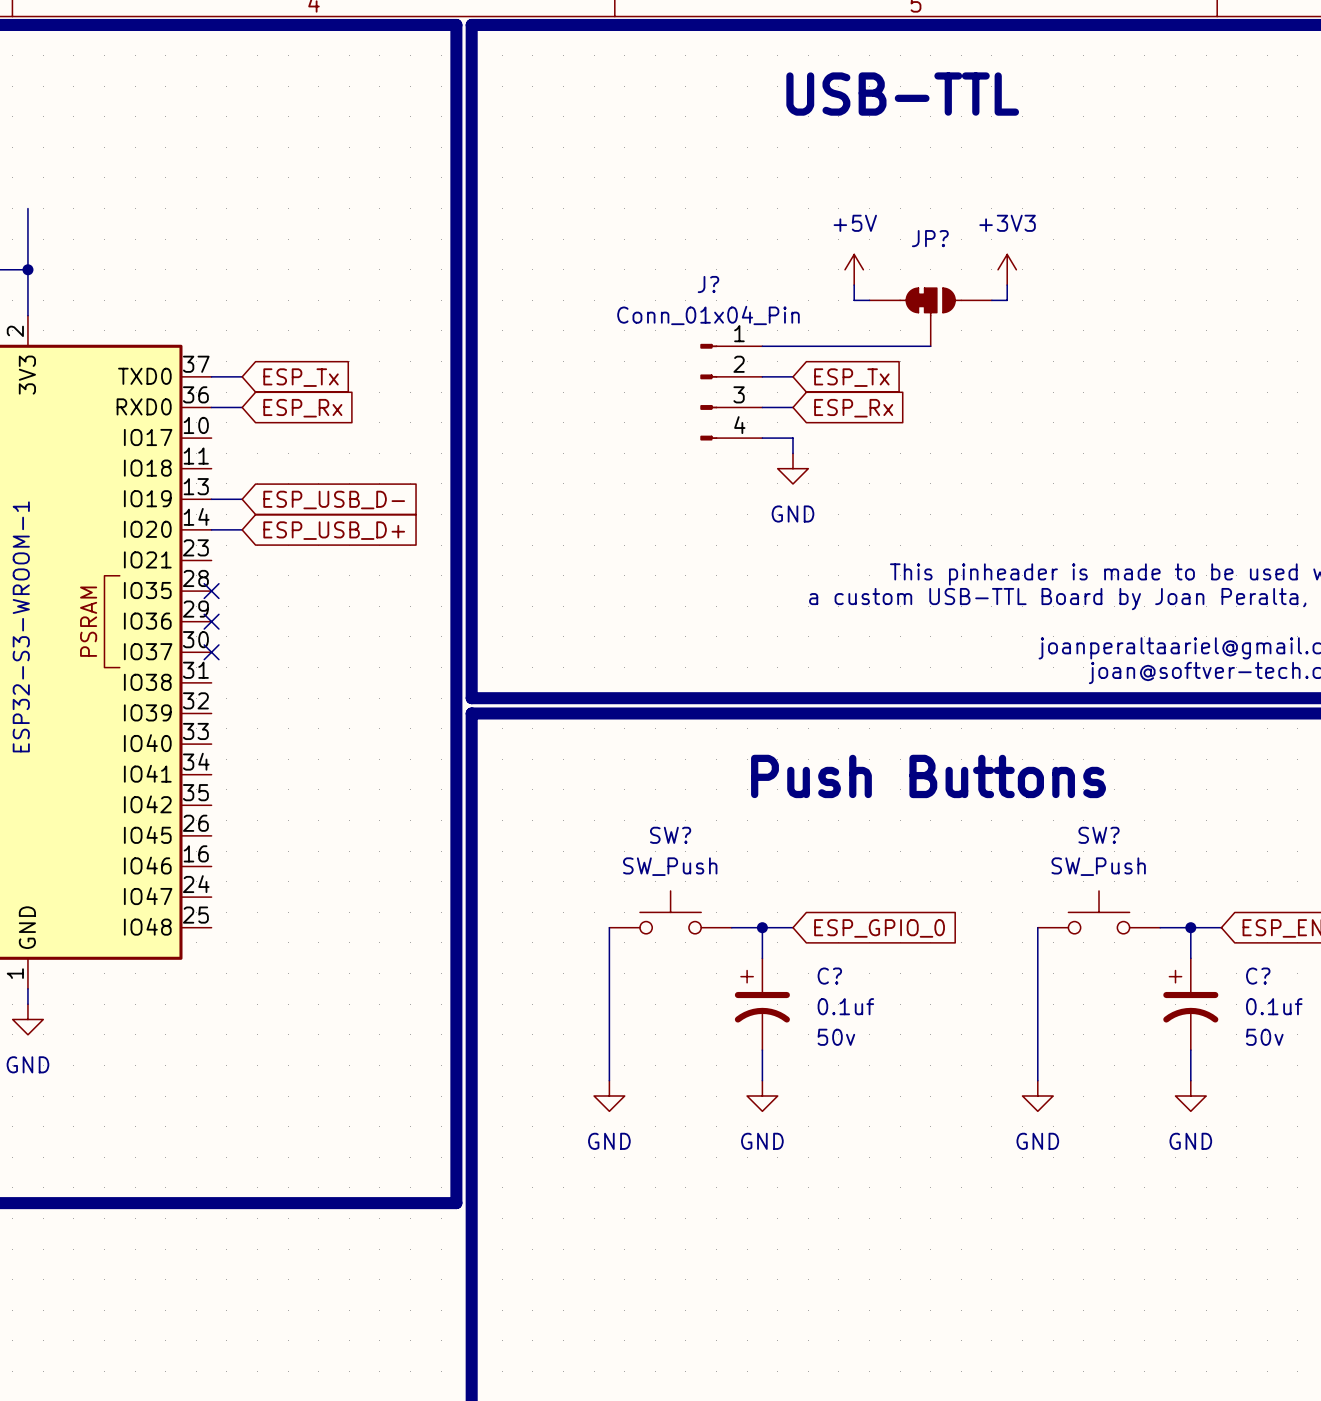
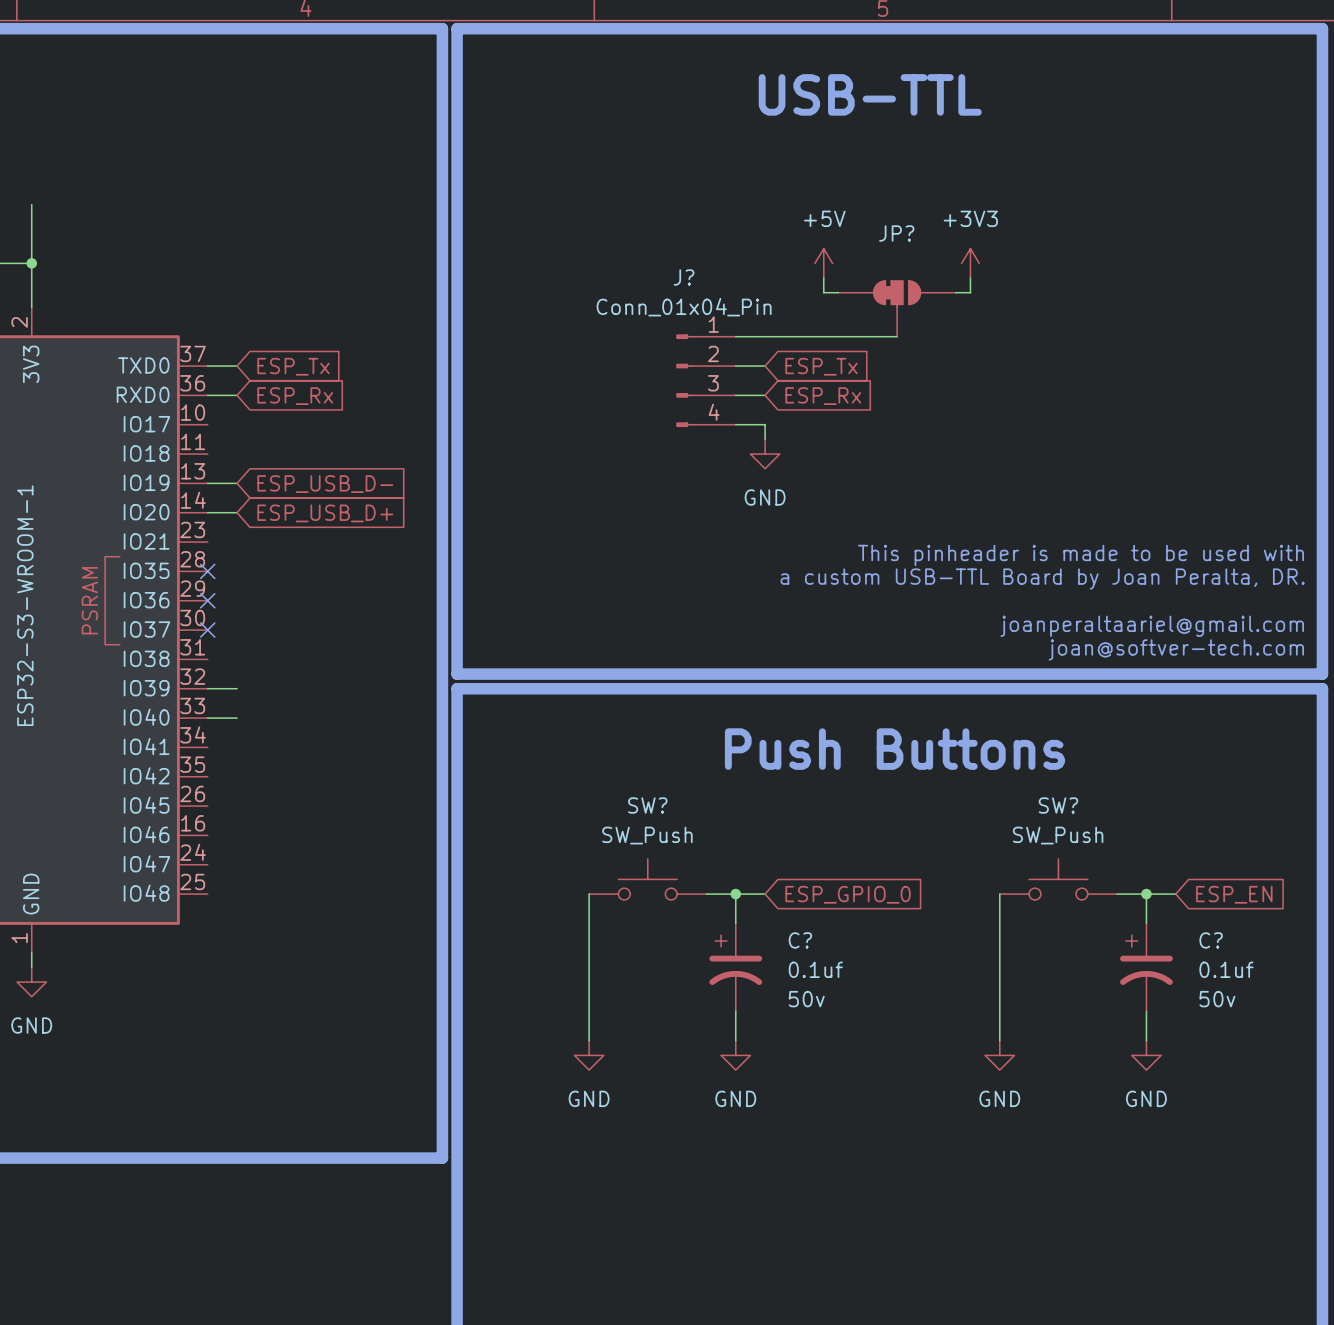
wire: none -> (207, 688) (237, 688)
wire: none -> (207, 718) (237, 718)

